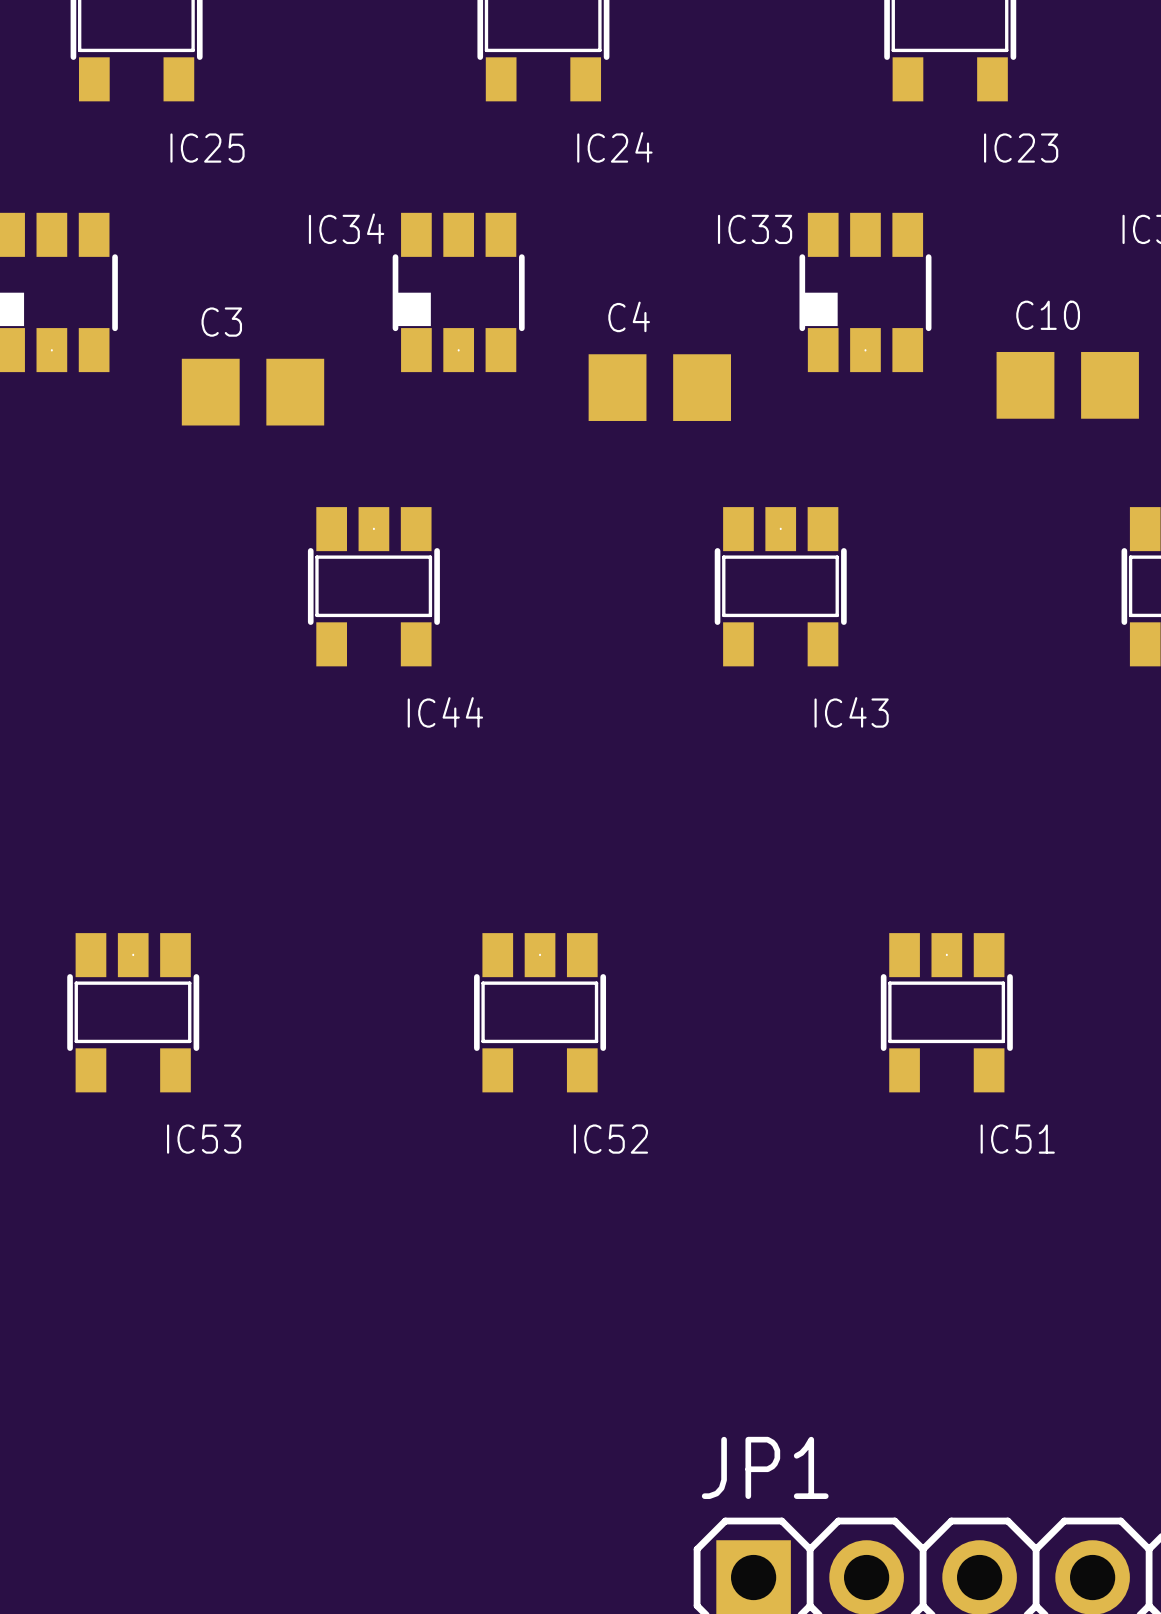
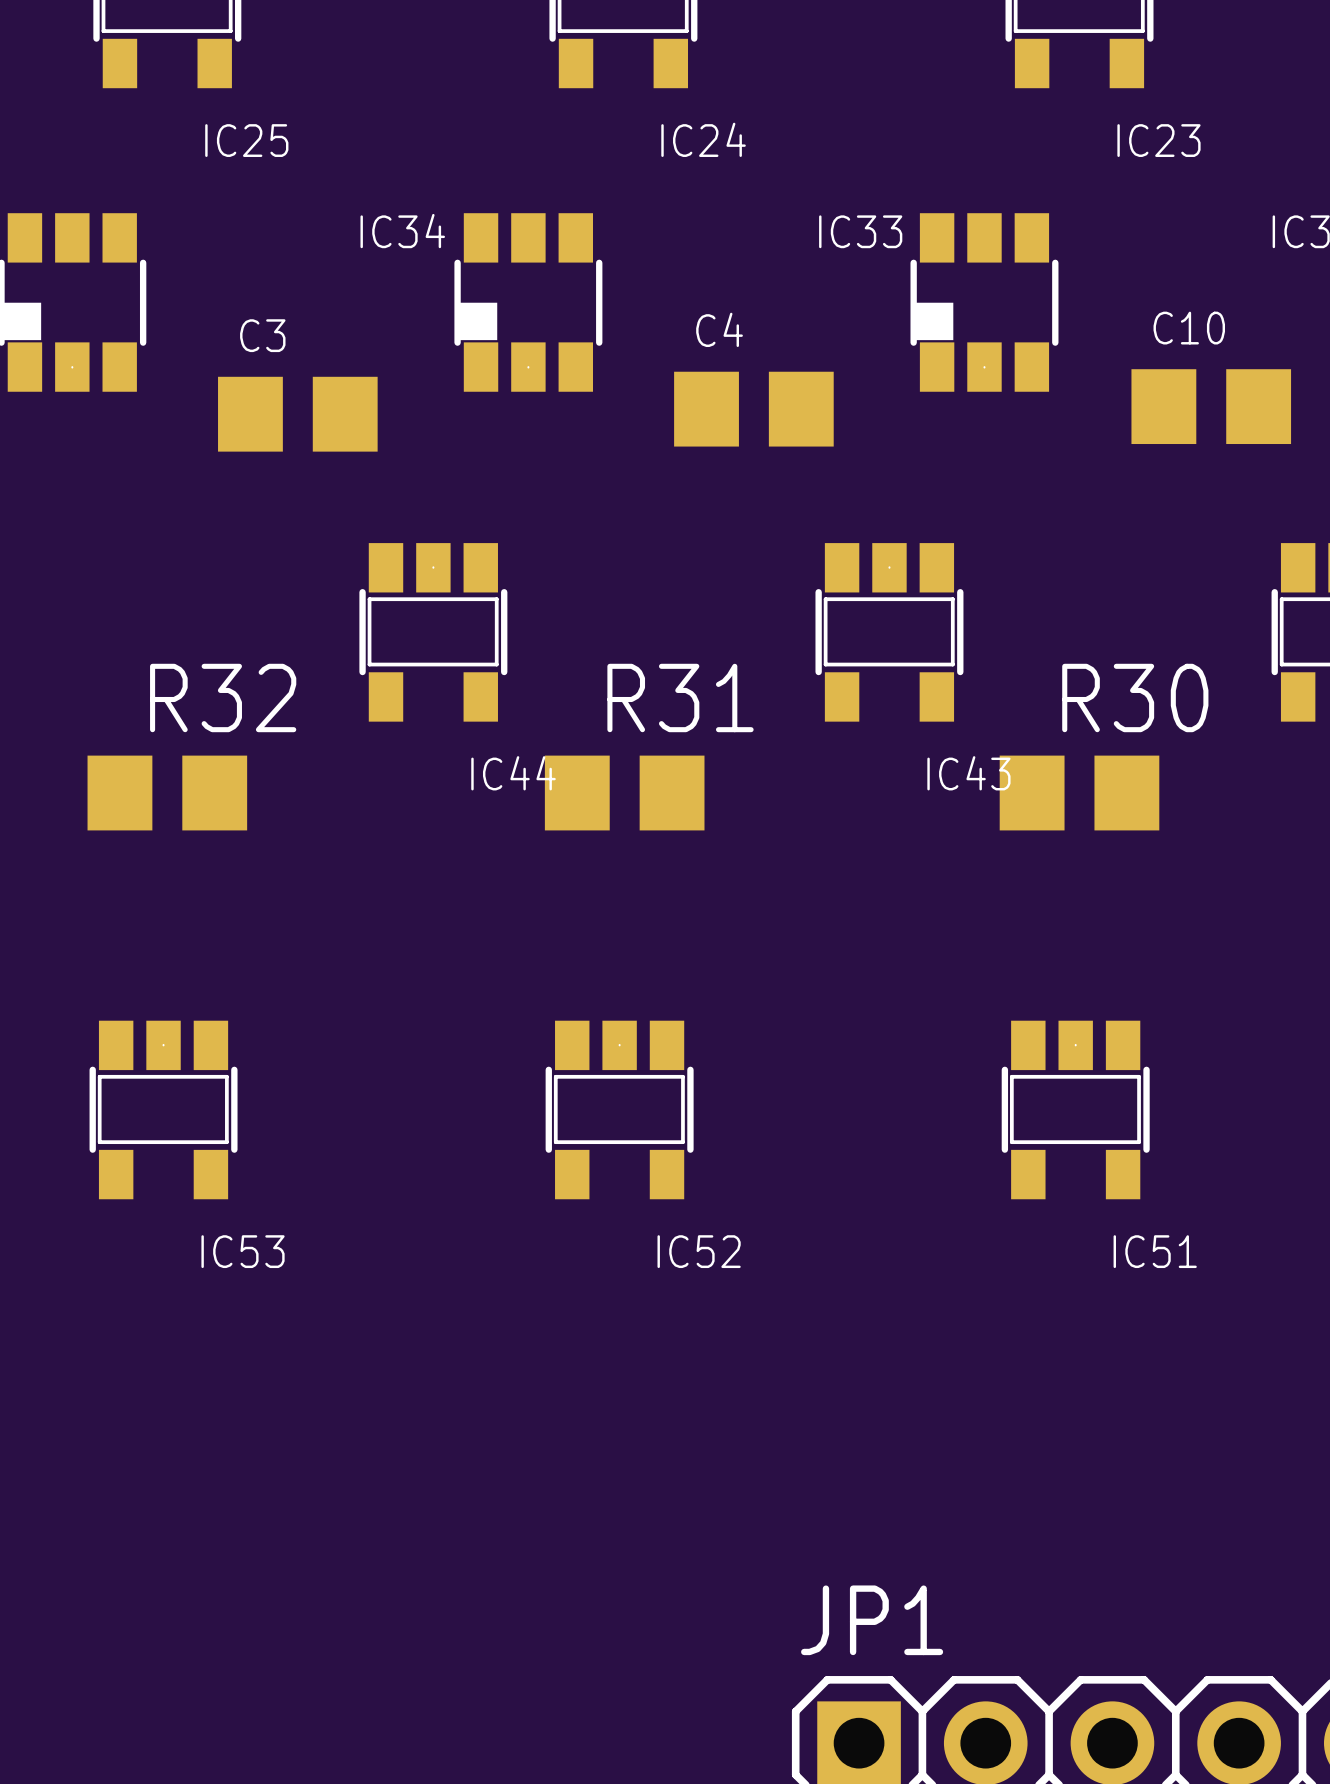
R32: none -> (167, 793)
R31: none -> (624, 793)
R30: none -> (1079, 793)

